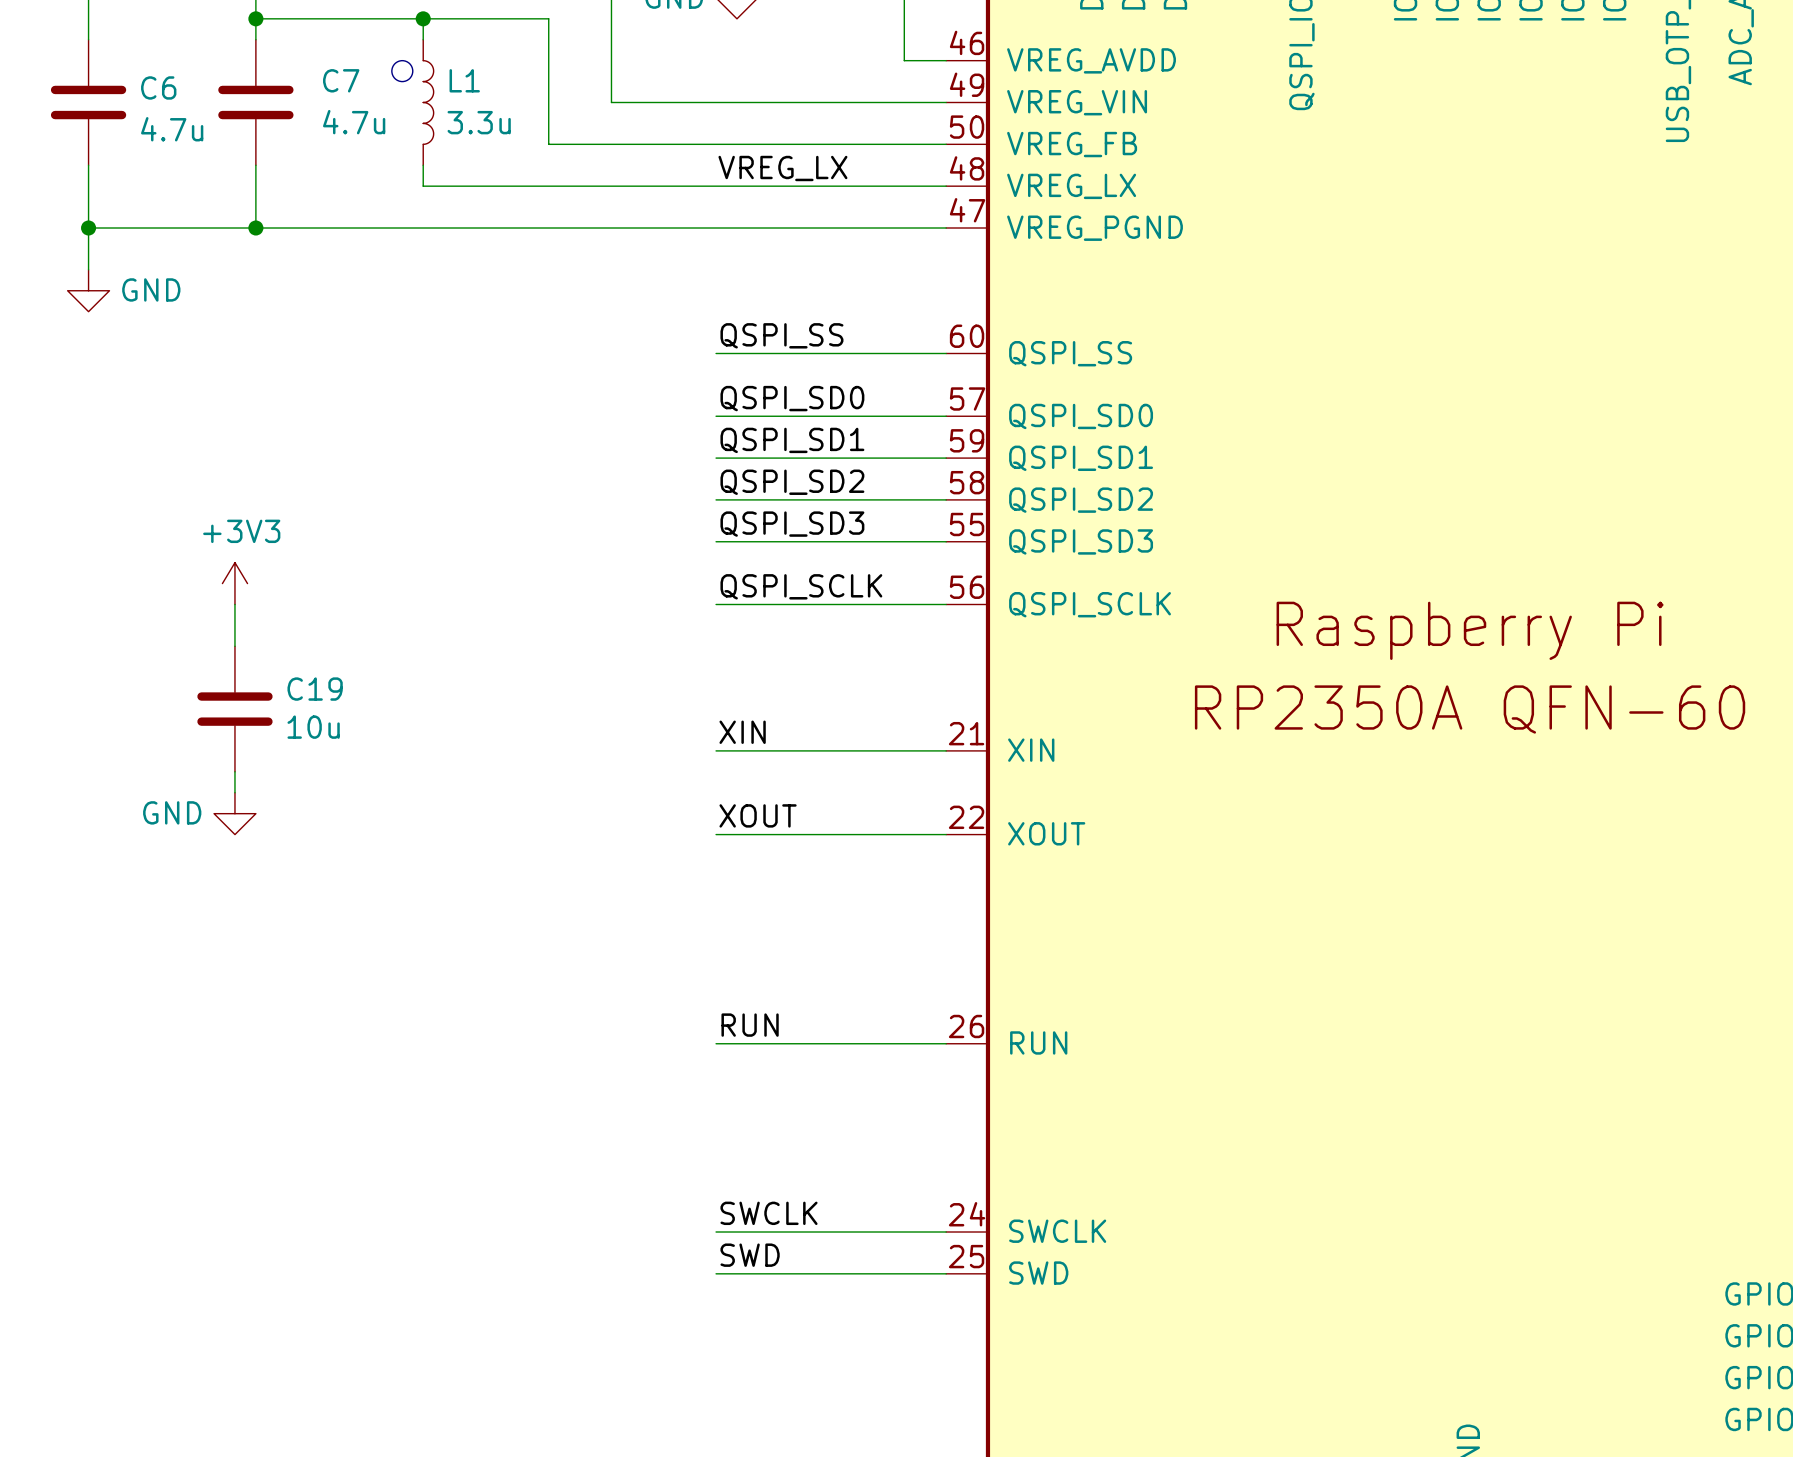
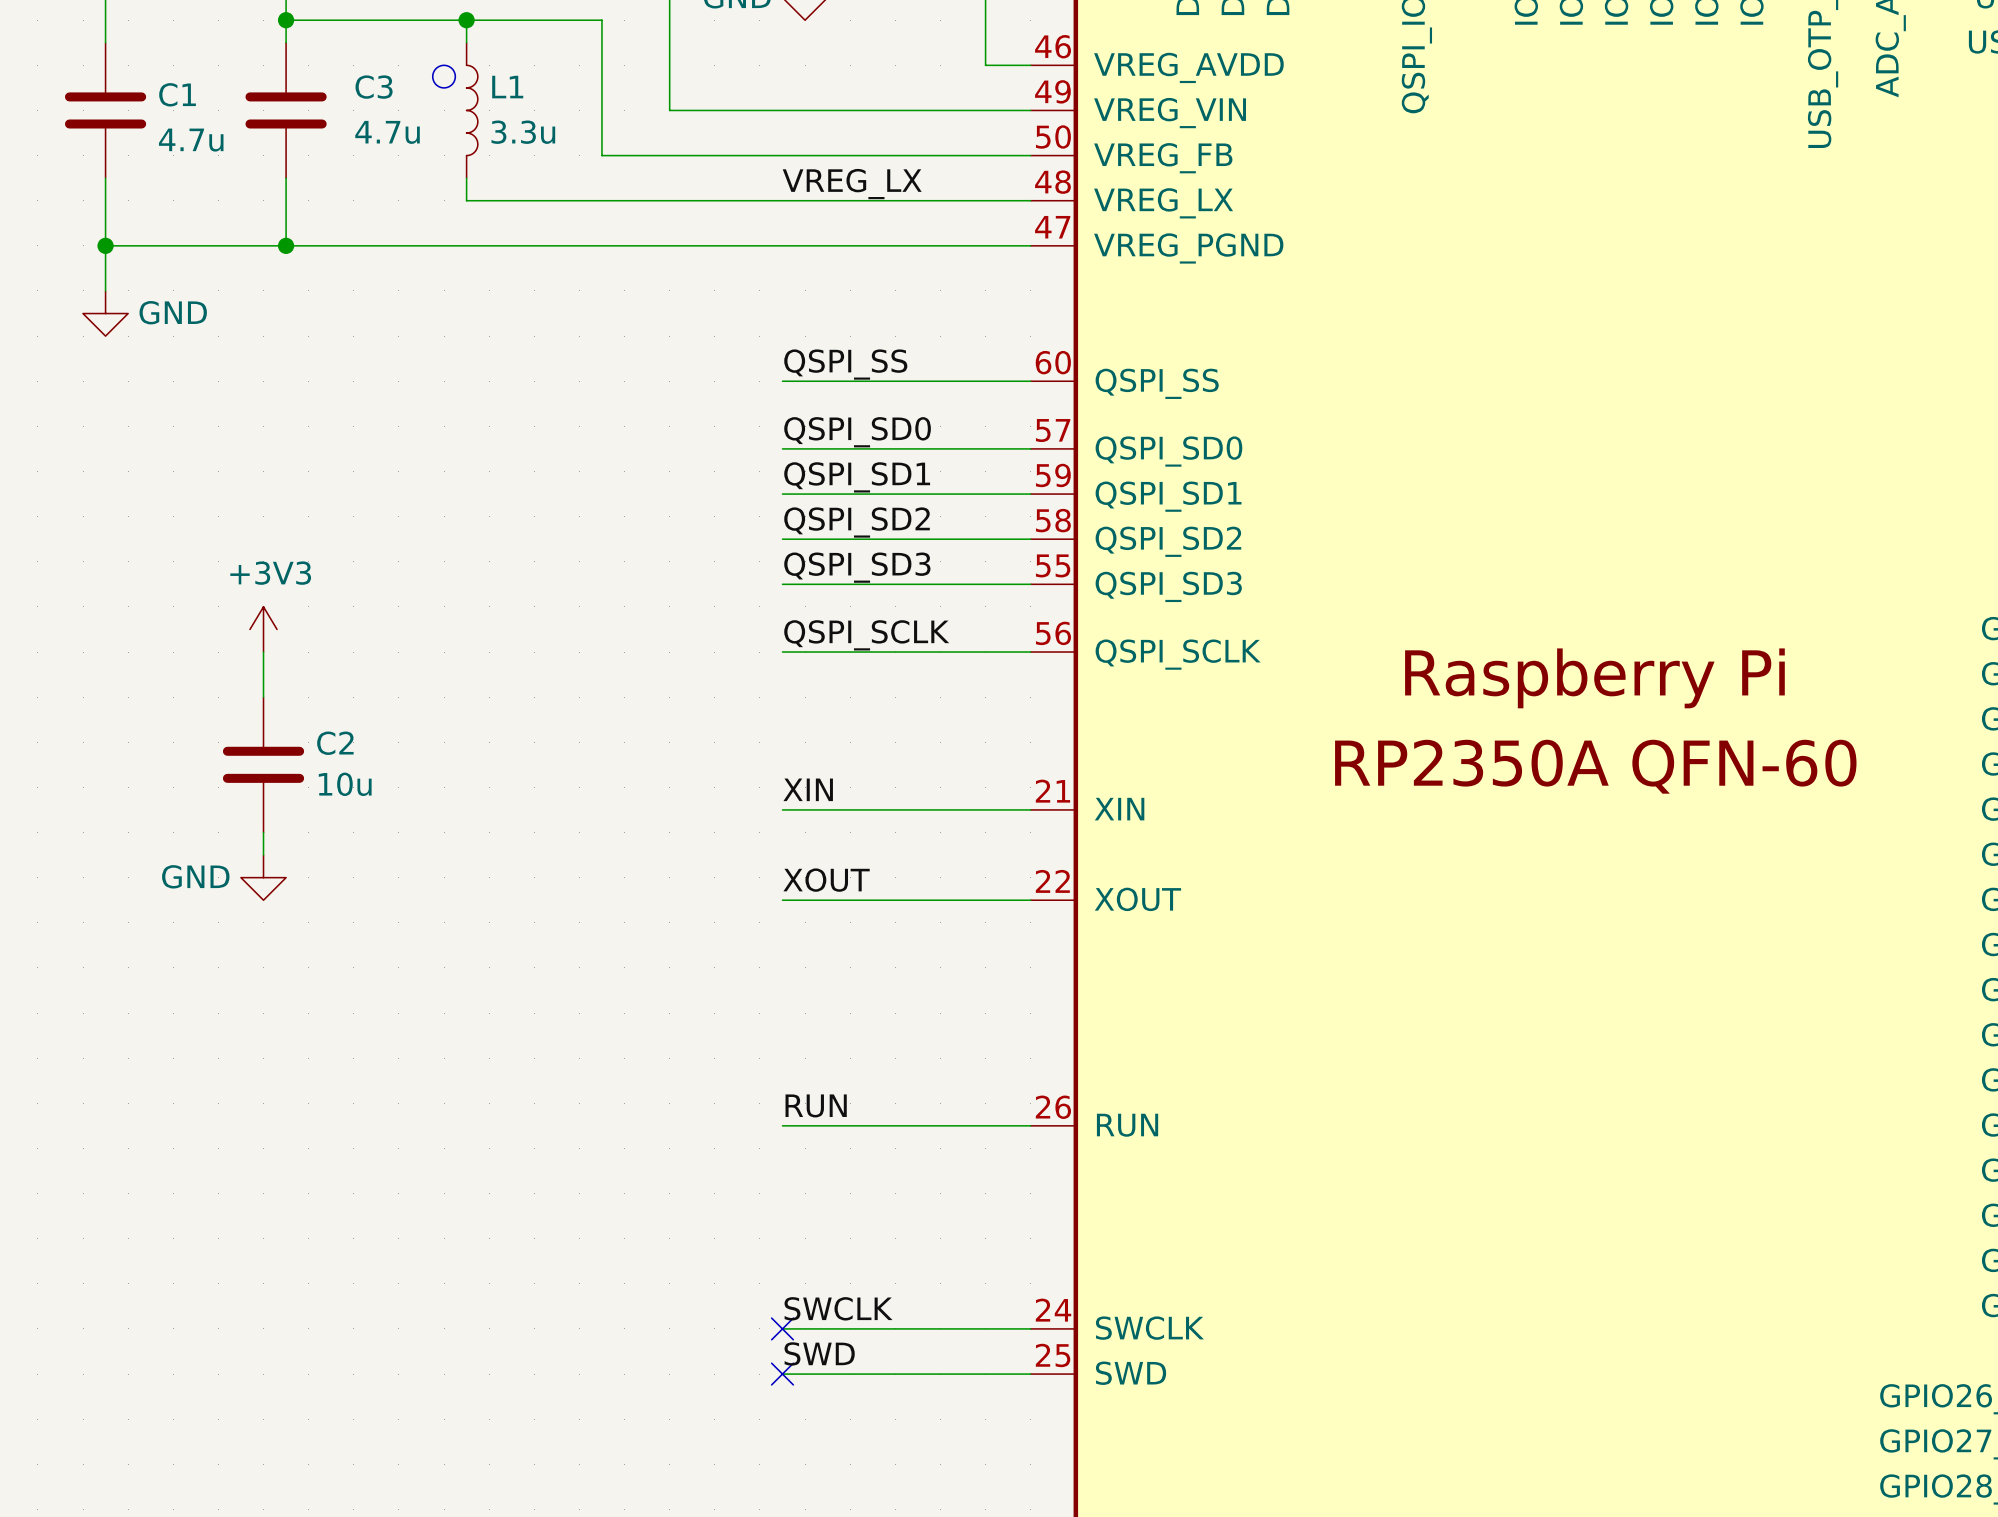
C7 name: C7 (341, 80) -> C3 (374, 87)
C6 name: C6 (158, 87) -> C1 (177, 94)
C19 name: C19 (315, 689) -> C2 (335, 743)
no-connect mark: none -> (782, 1328)
no-connect mark: none -> (782, 1374)

